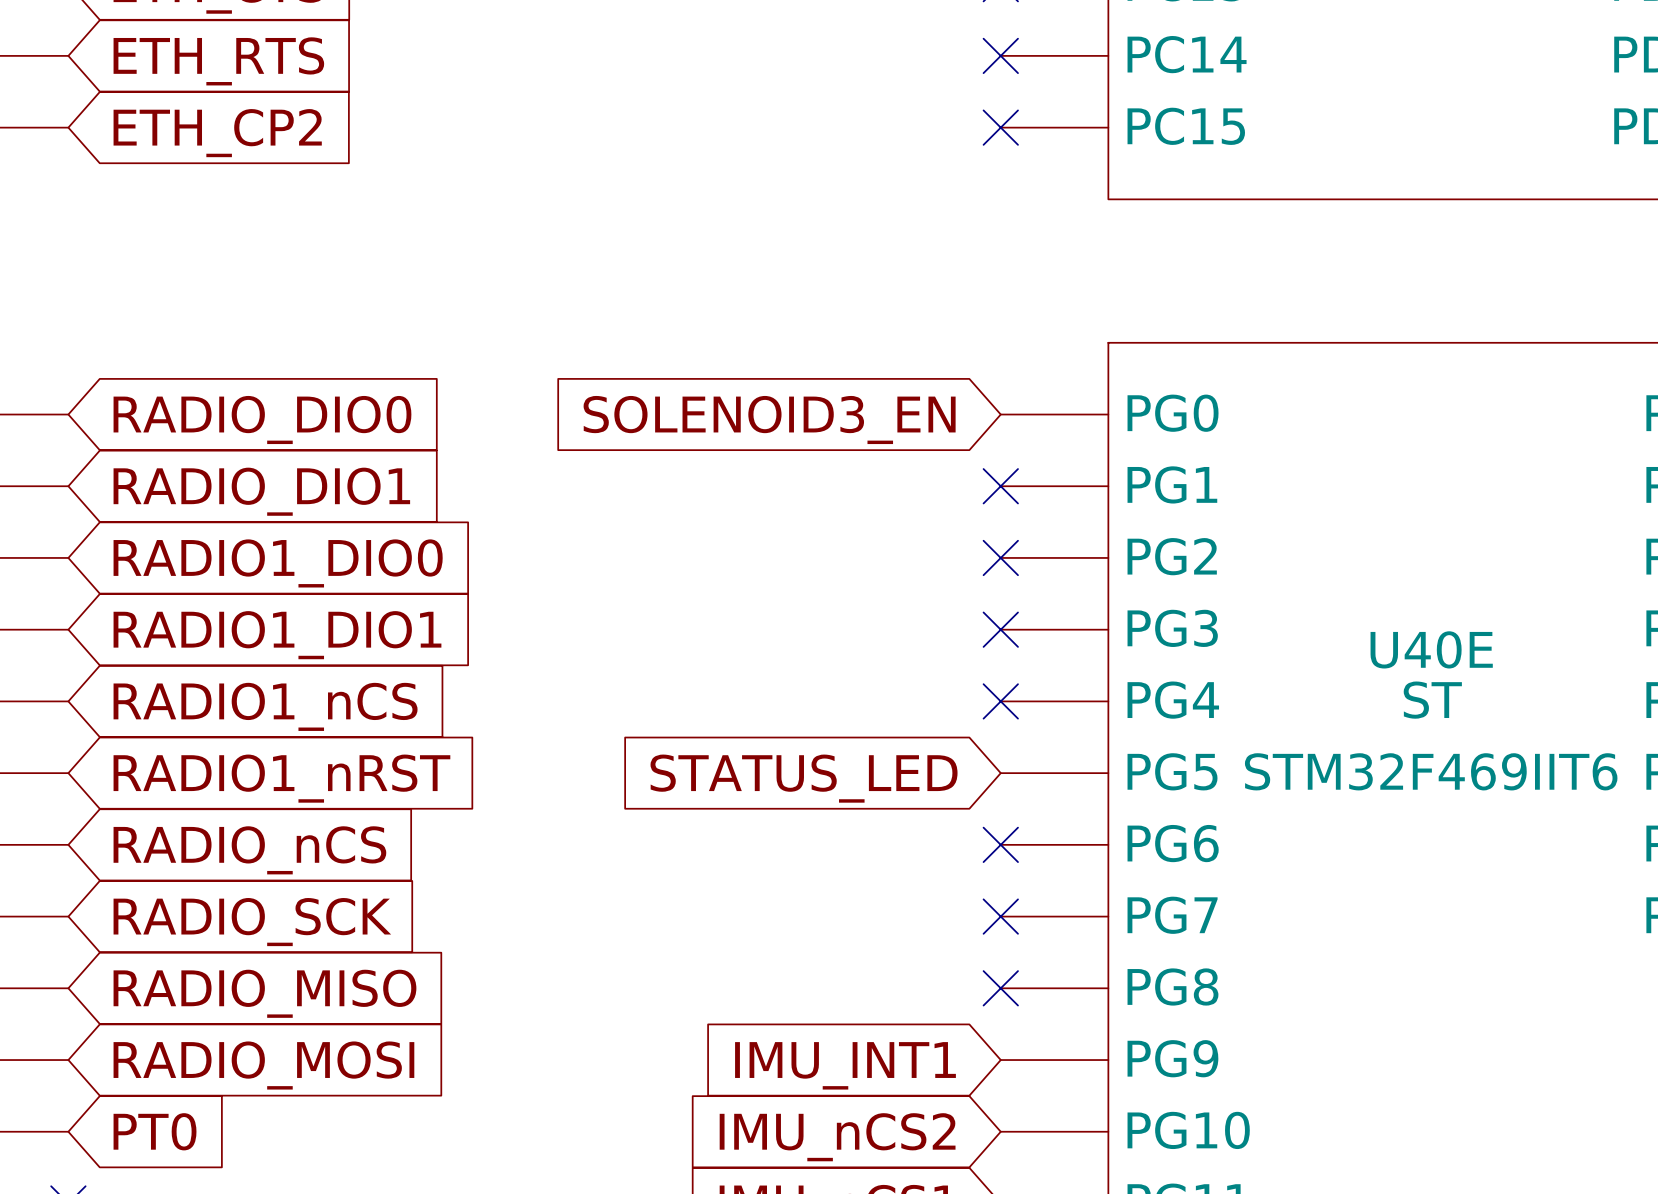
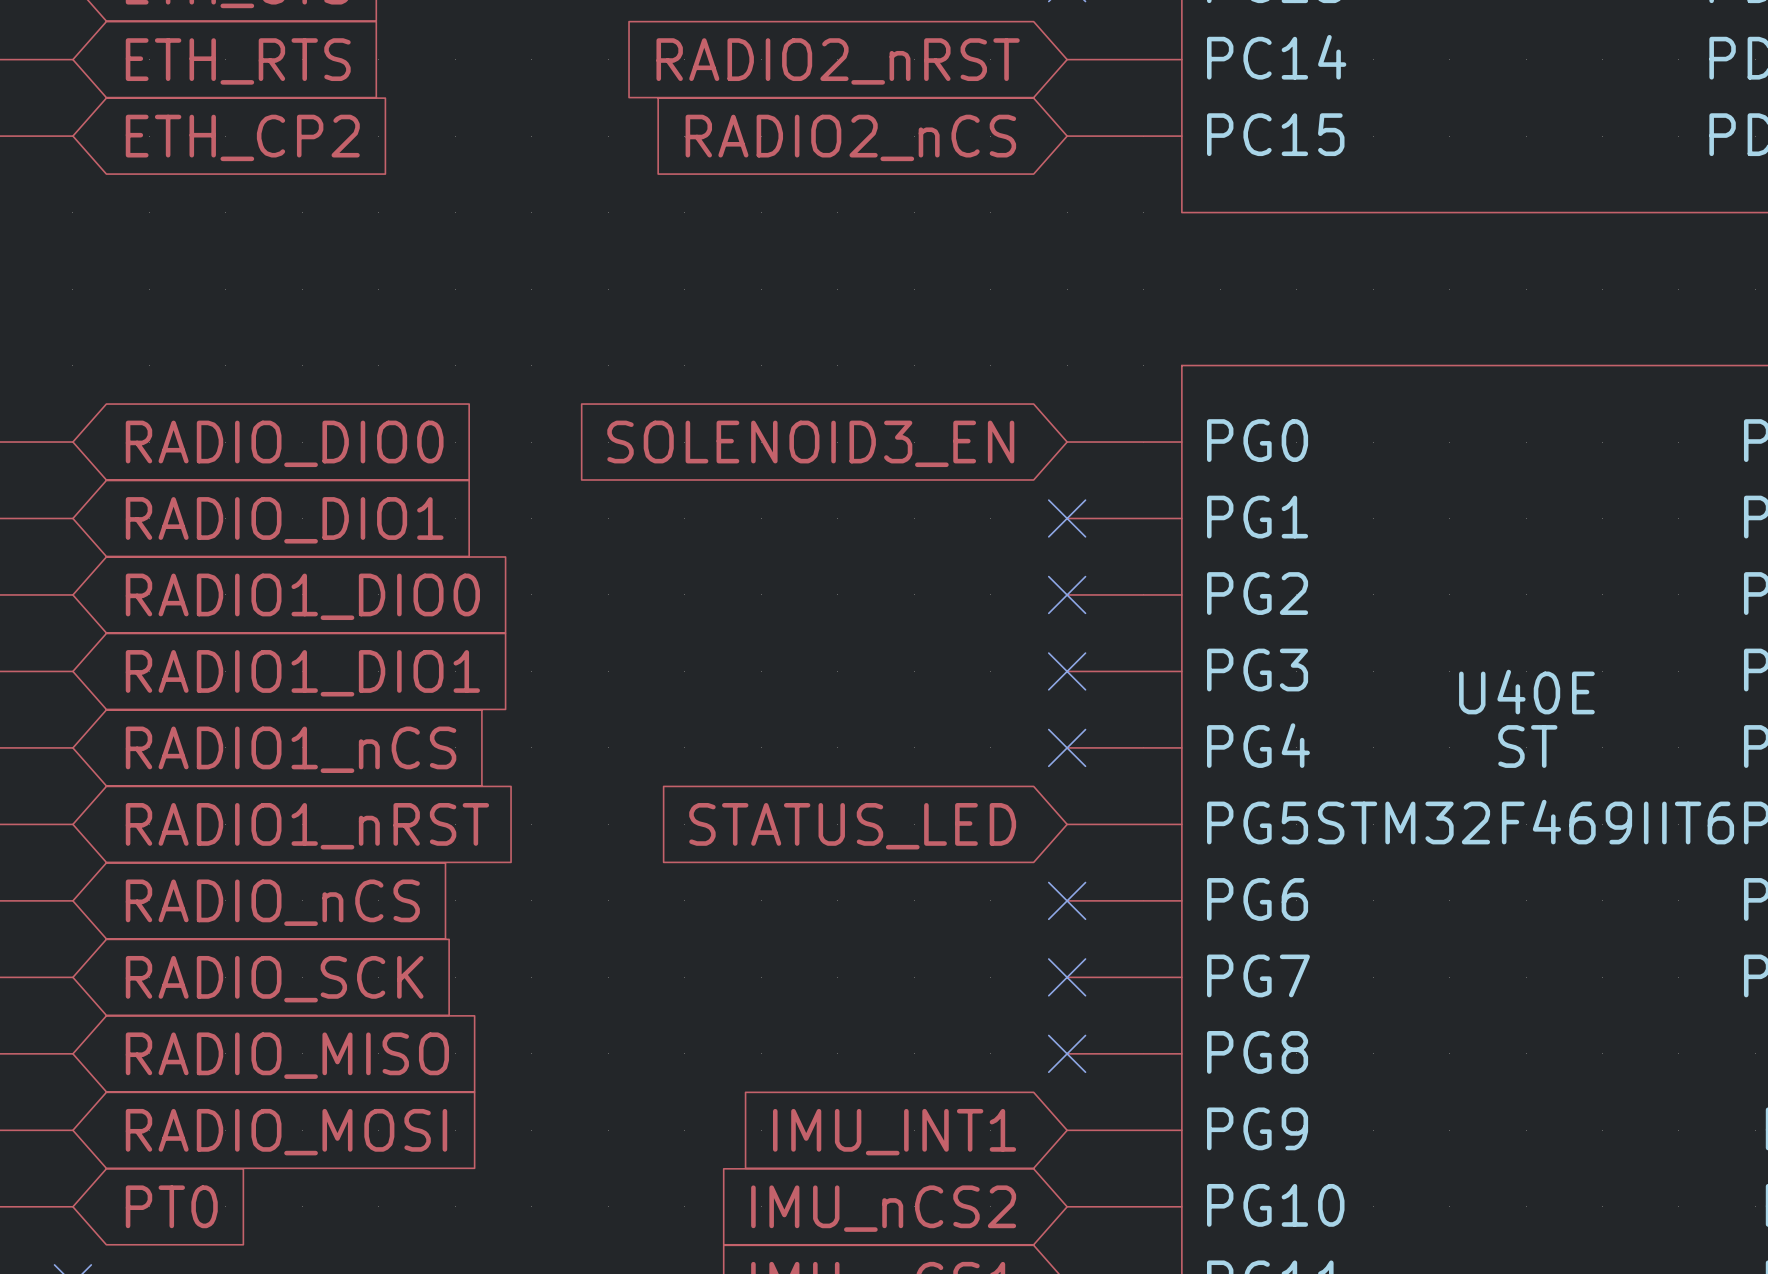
no-connect mark: (1000, 55) -> none
global label: none -> RADIO2_nRST (838, 61)
no-connect mark: (1000, 127) -> none
global label: none -> RADIO2_nCS (850, 137)

